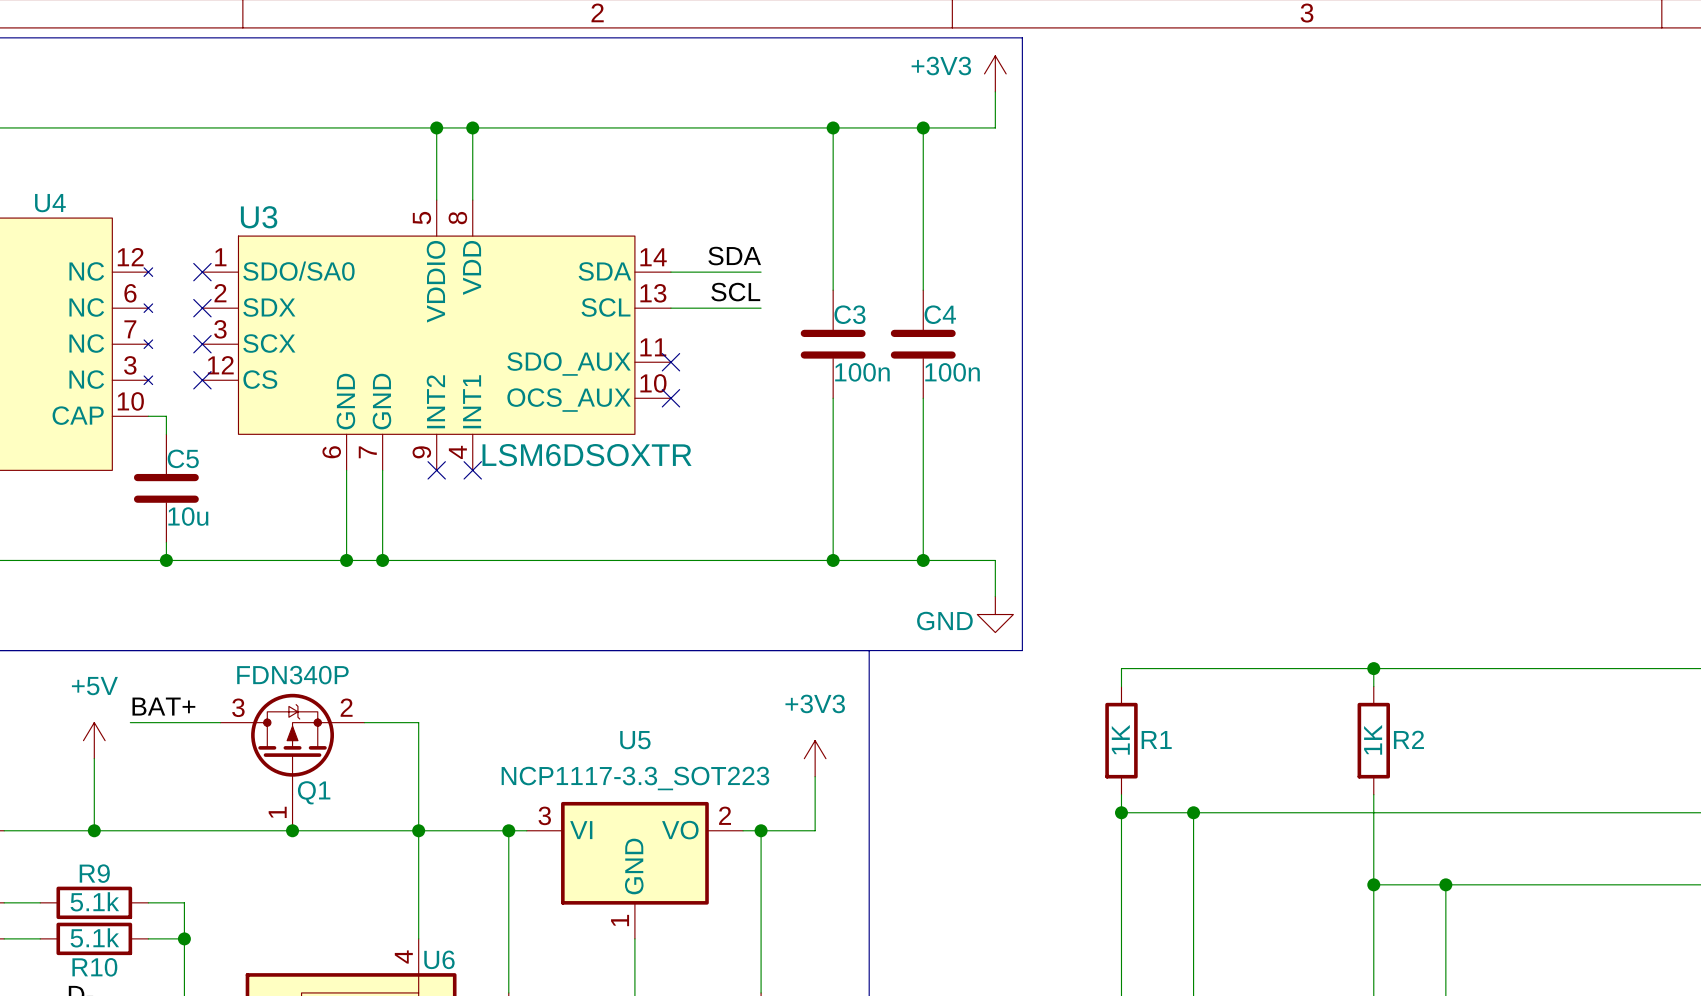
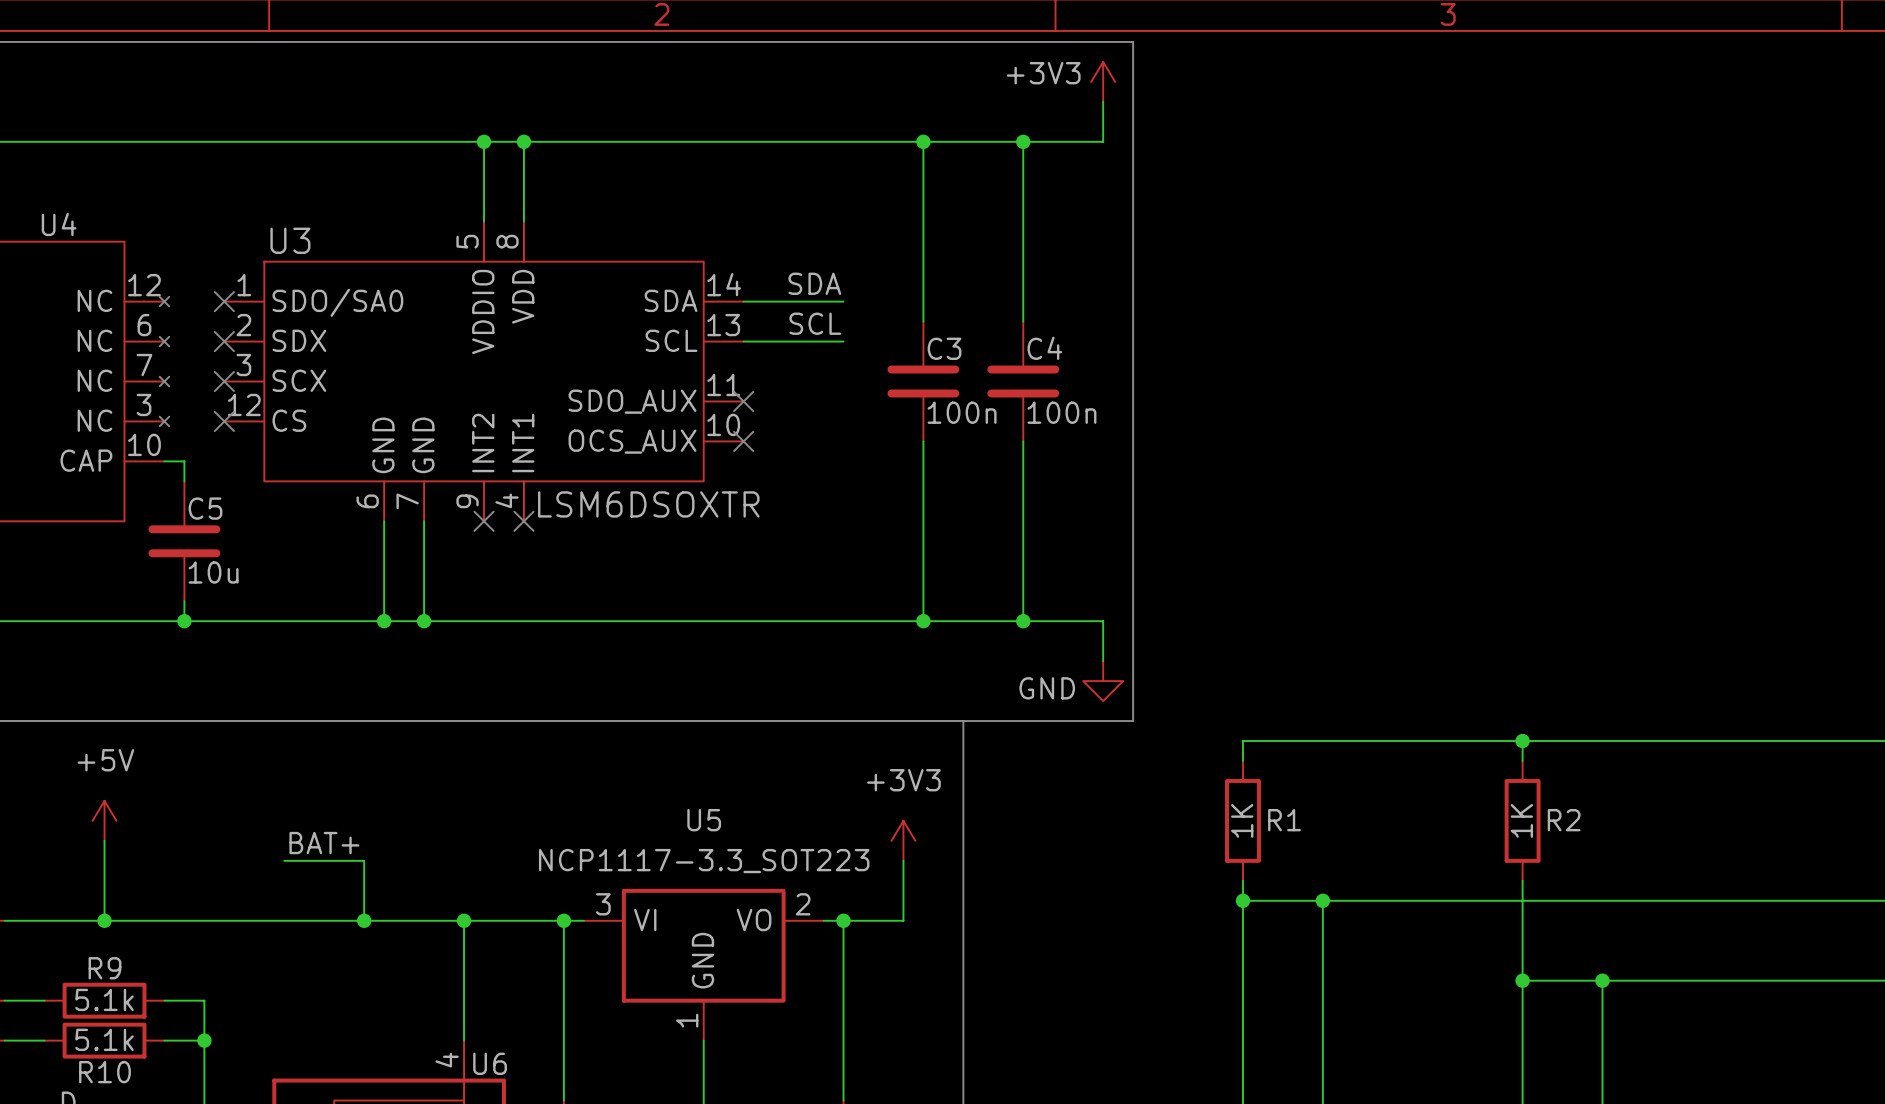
label position: BAT+ (163, 706) -> BAT+ (324, 843)
wire: (130, 722) (220, 722) -> none
wire: (364, 722) (418, 722) (418, 830) -> none
Q1: FDN340P (292, 762) -> none
wire: none -> (284, 860) (364, 860) (364, 920)
junction position: (292, 830) -> (364, 920)

